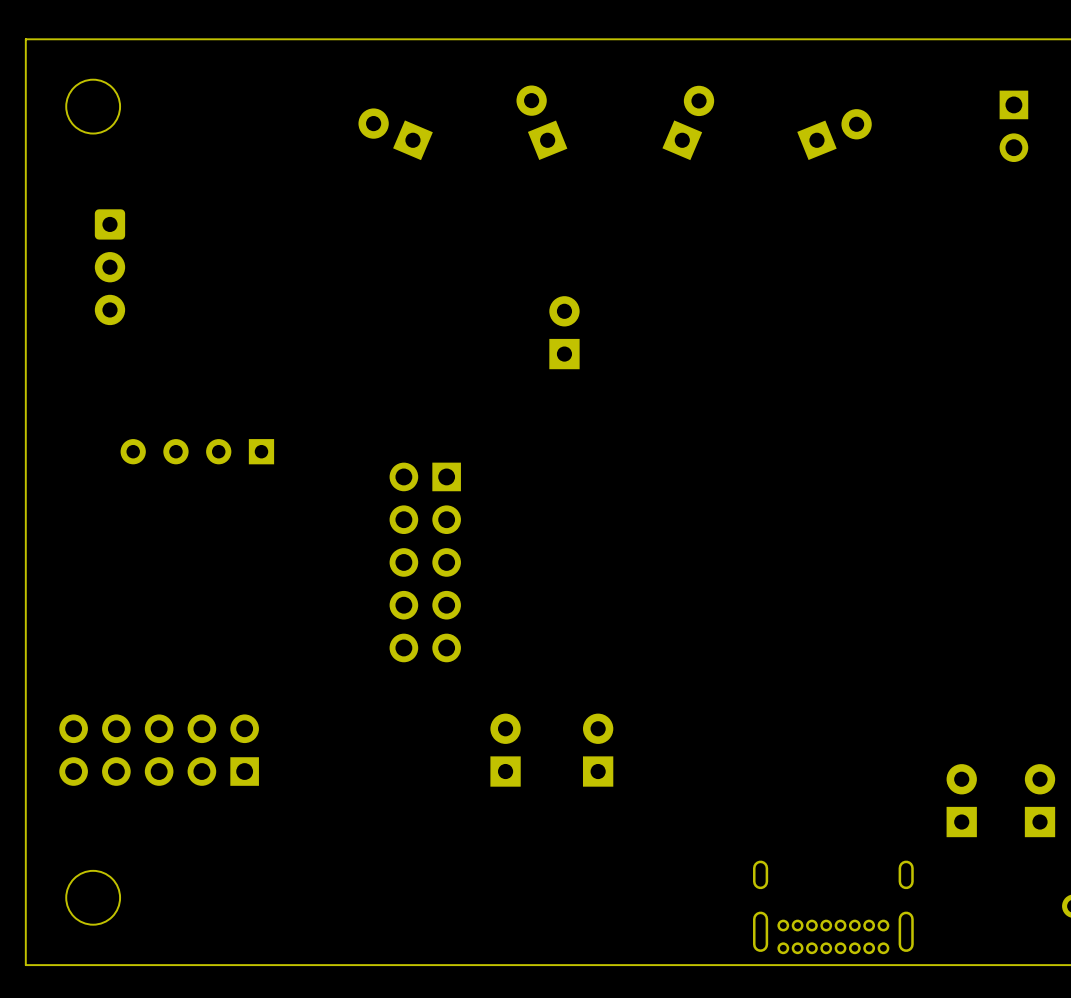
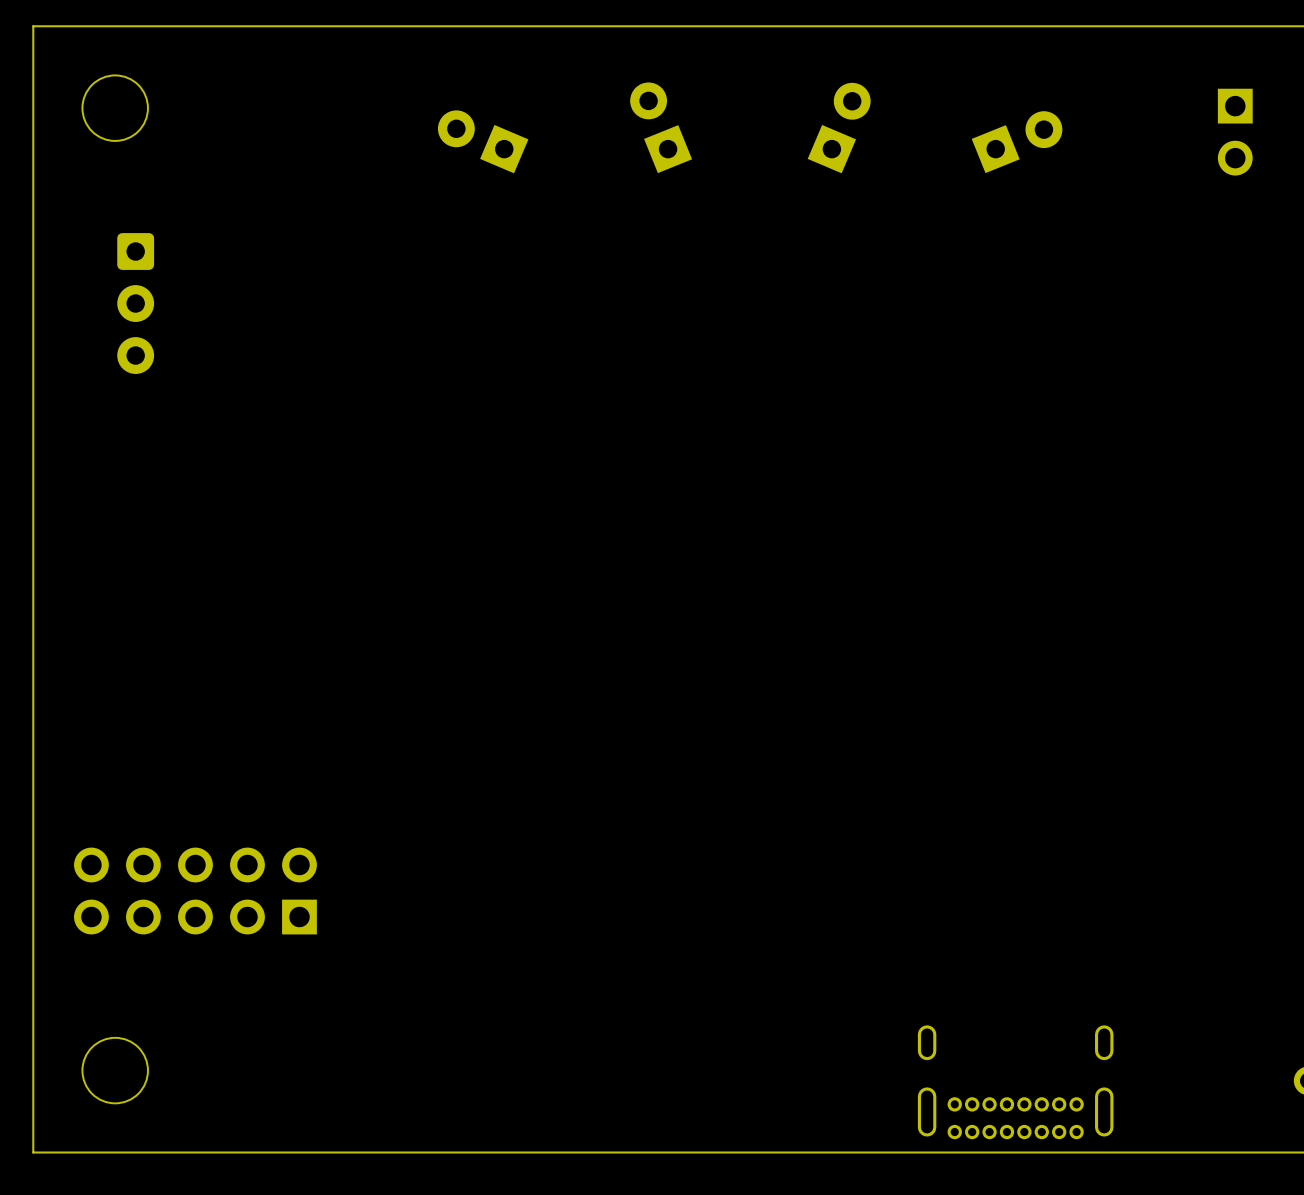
part: (564, 332) -> none
part: (197, 451) -> none
part: (425, 562) -> none
part: (505, 750) -> none
part: (598, 750) -> none
part: (961, 800) -> none
part: (1040, 800) -> none

